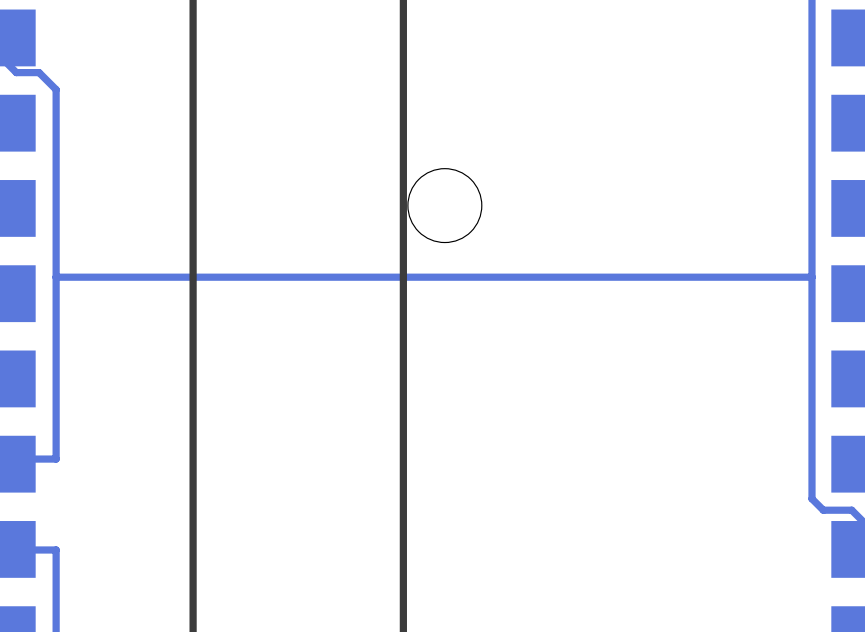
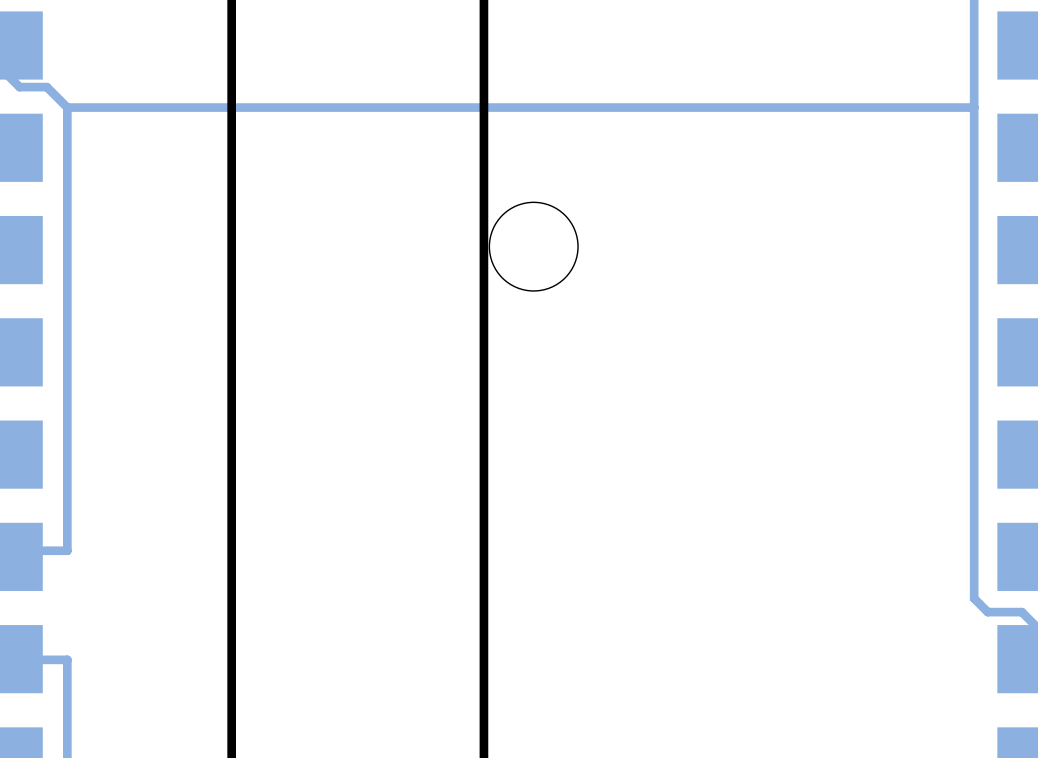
track: (811, 277) (56, 277) -> (974, 107) (67, 107)

